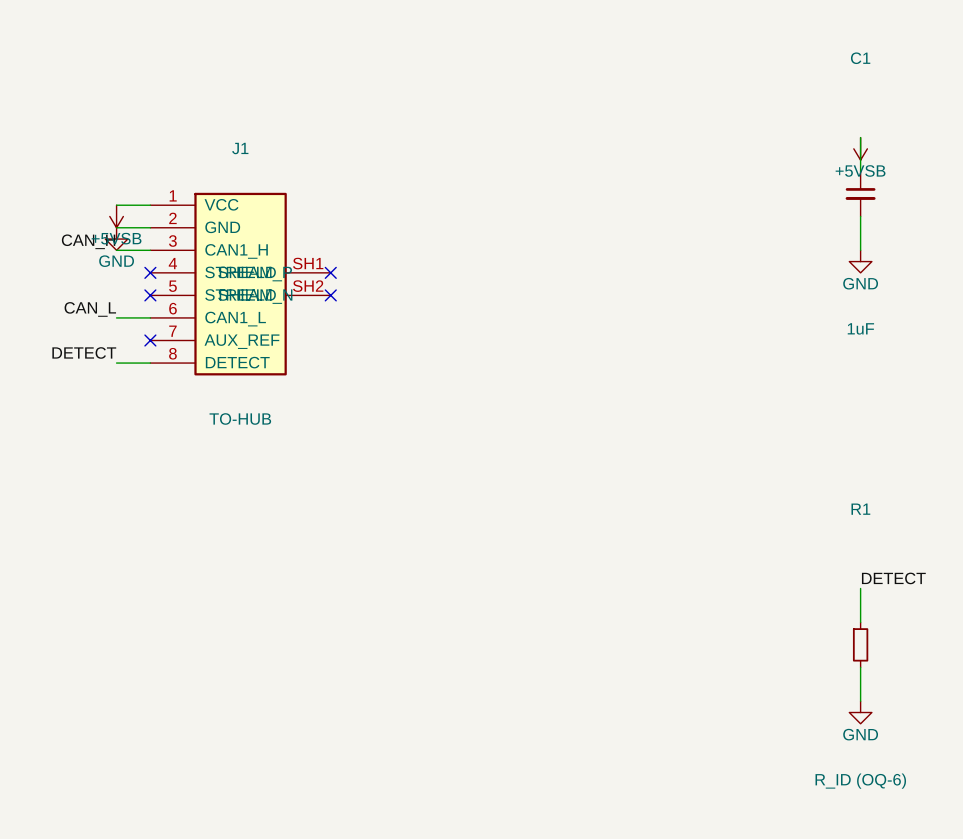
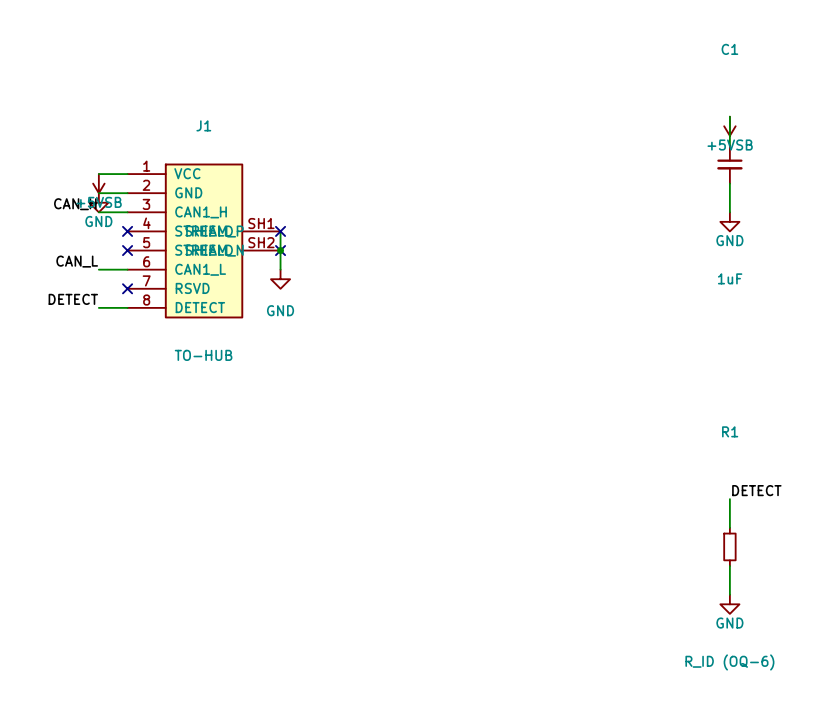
wire: none -> (280, 231) (280, 269)
junction: none -> (280, 250)
power symbol: none -> GND (280, 279)
J1 pin name: AUX_REF (241, 341) -> RSVD (192, 288)

